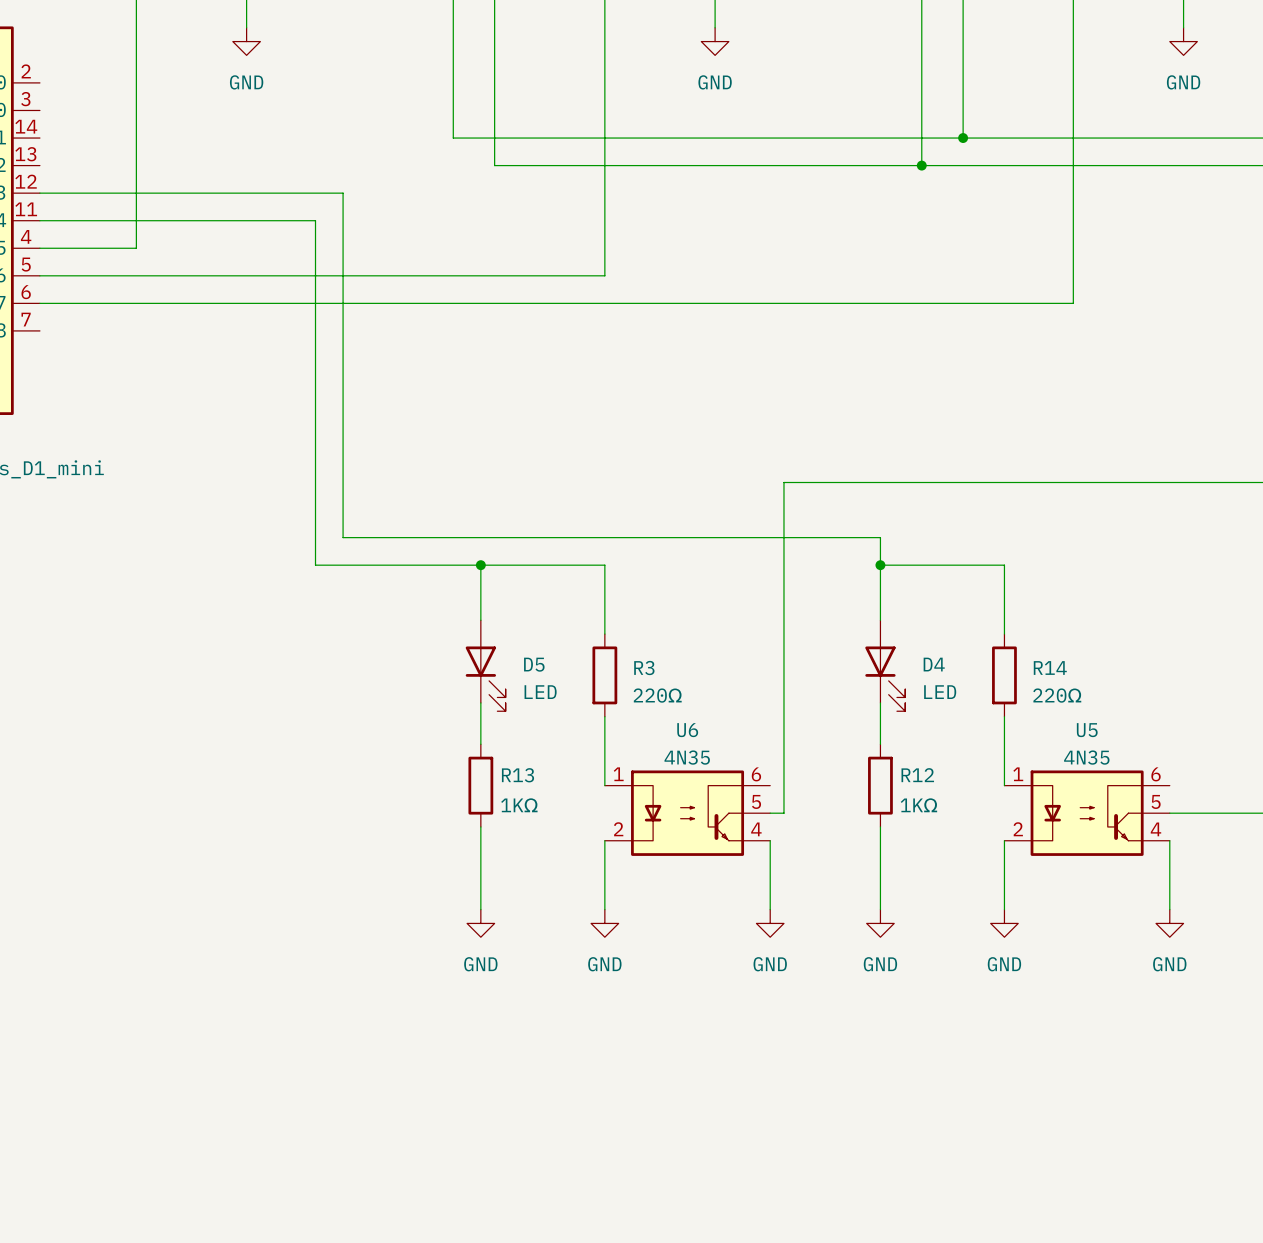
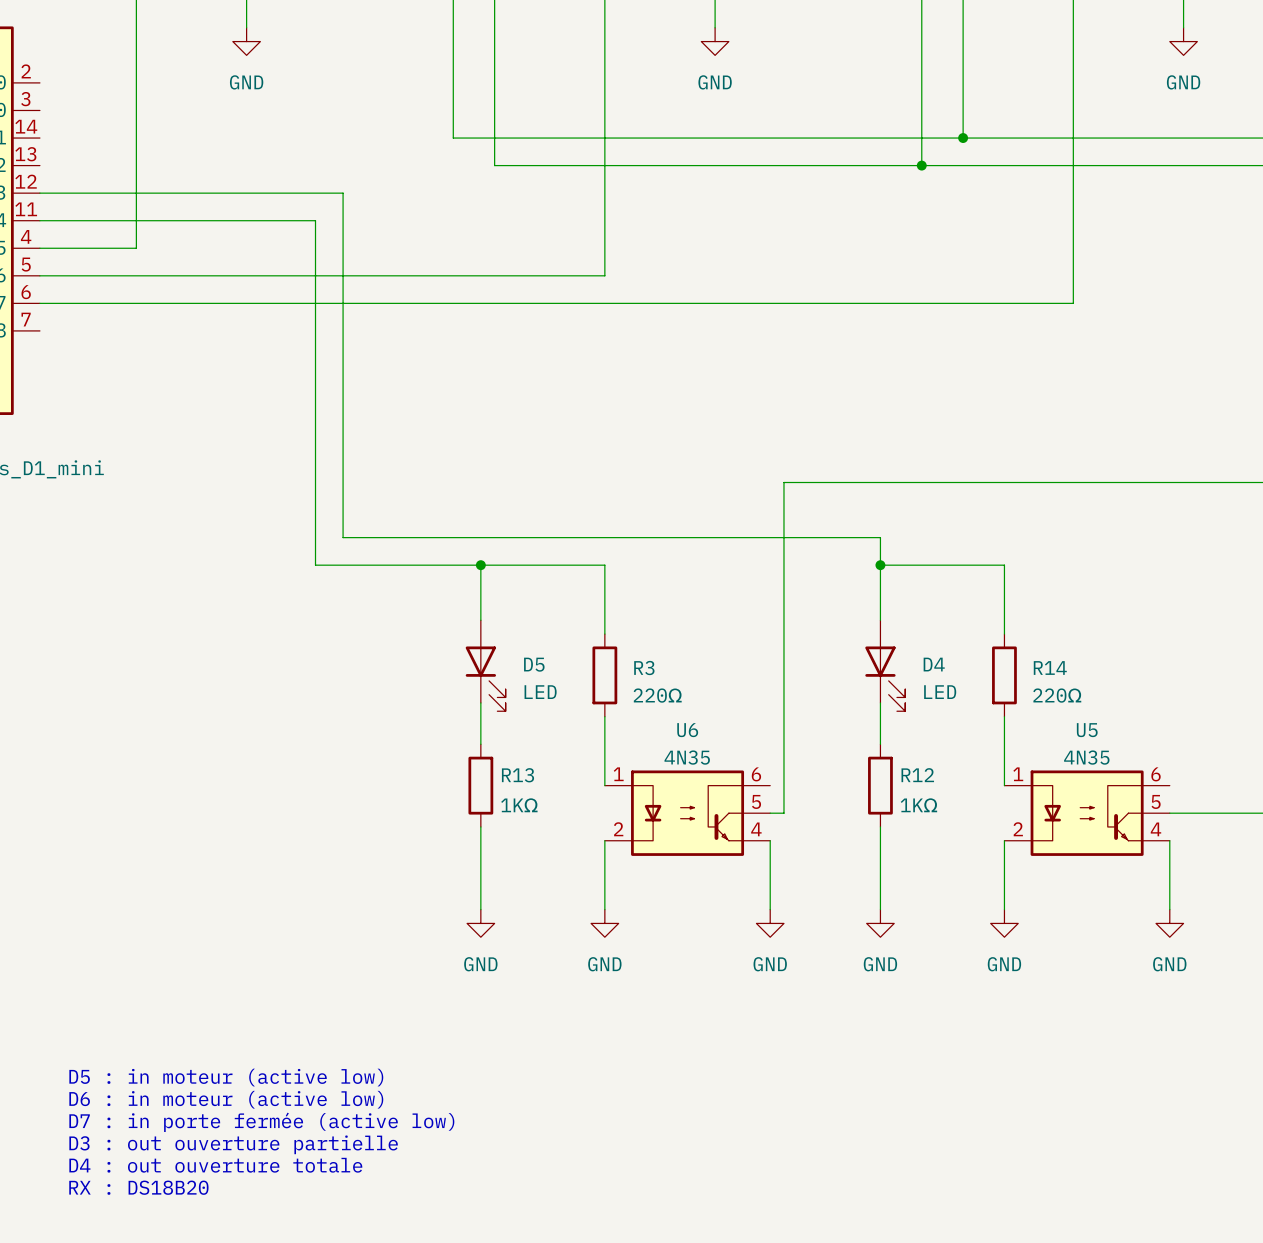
text: none -> D5 : in moteur (active low) (226, 1077)
text: none -> D6 : in moteur (active low) (226, 1099)
text: none -> D7 : in porte fermée (active low) (261, 1122)
text: none -> D3 : out ouverture partielle (233, 1144)
text: none -> D4 : out ouverture totale (215, 1165)
text: none -> RX : DS18B20 (138, 1187)

